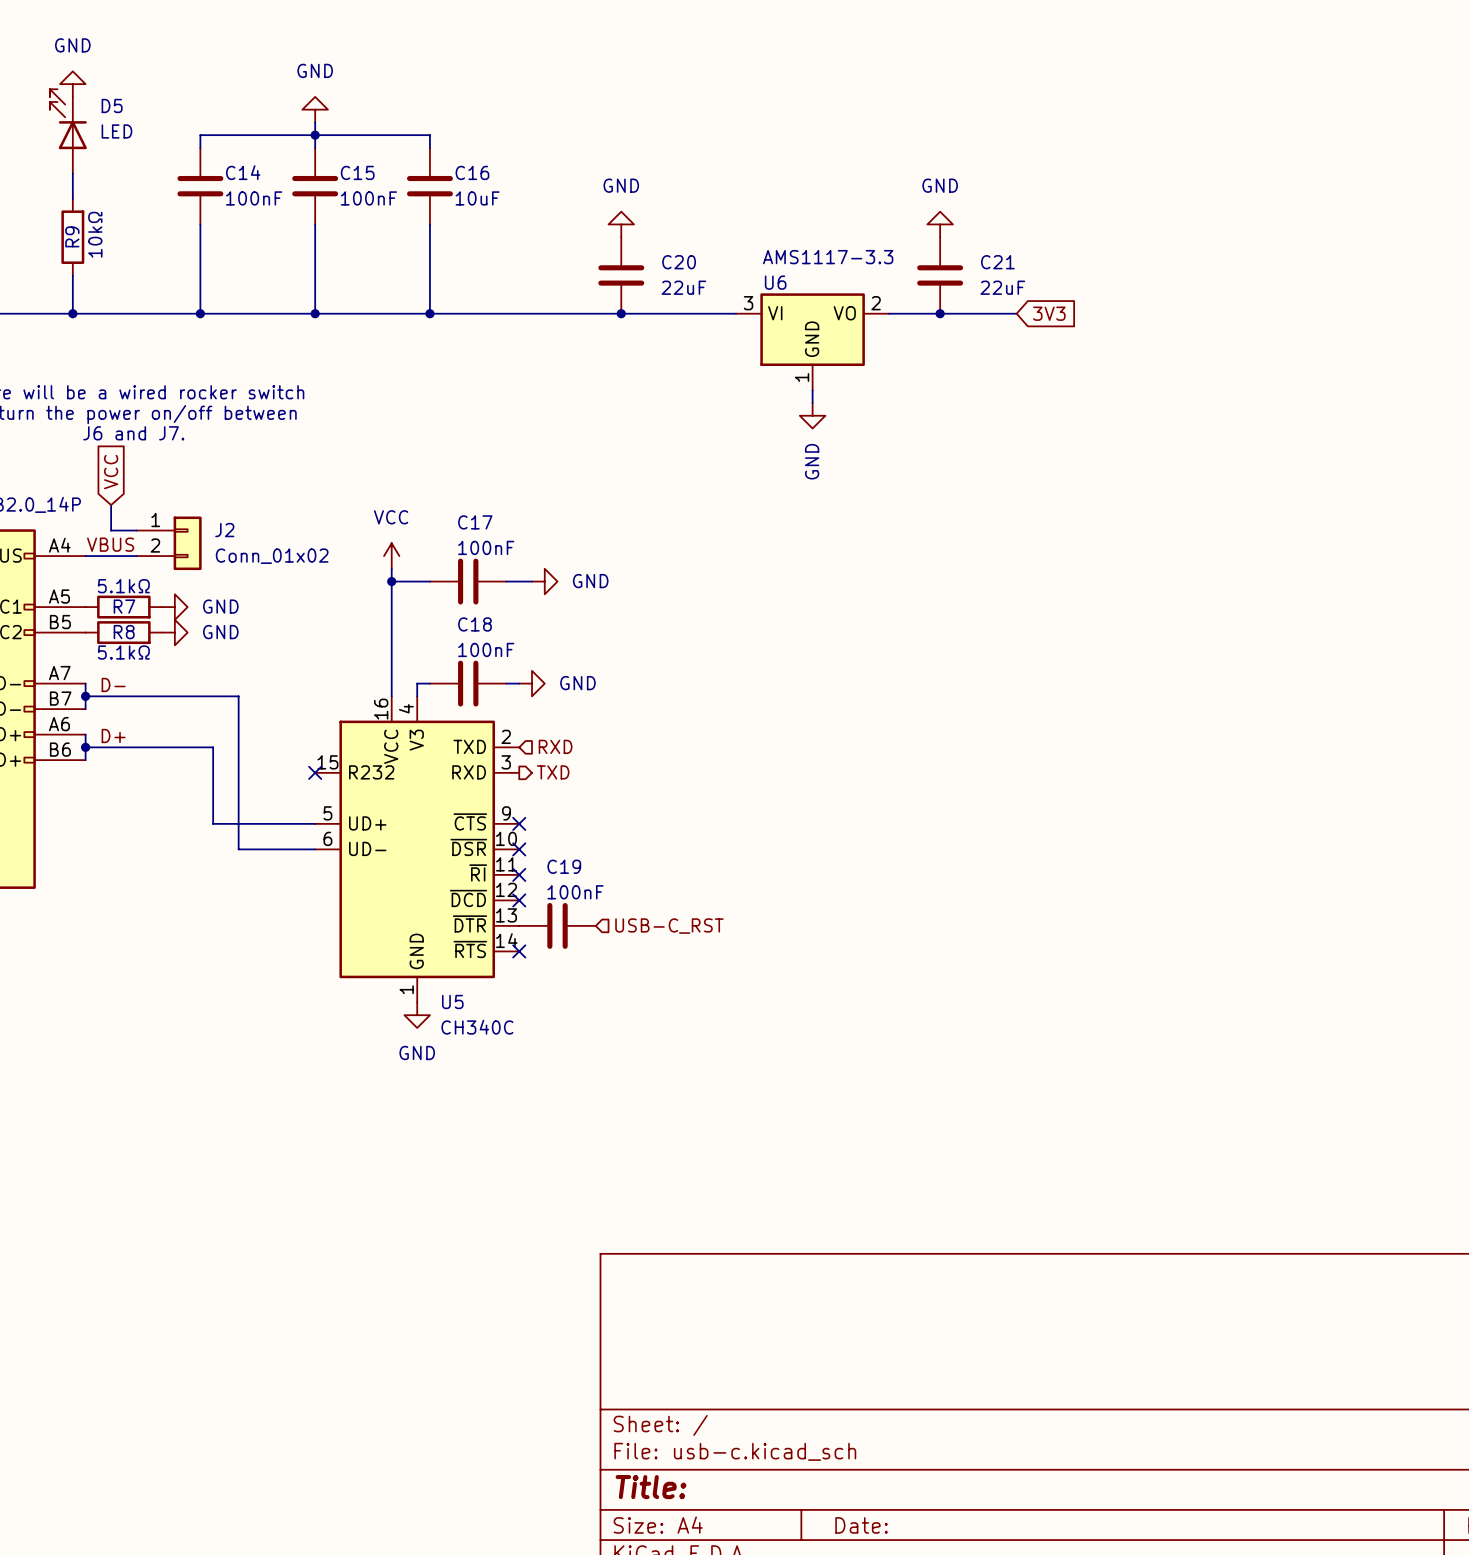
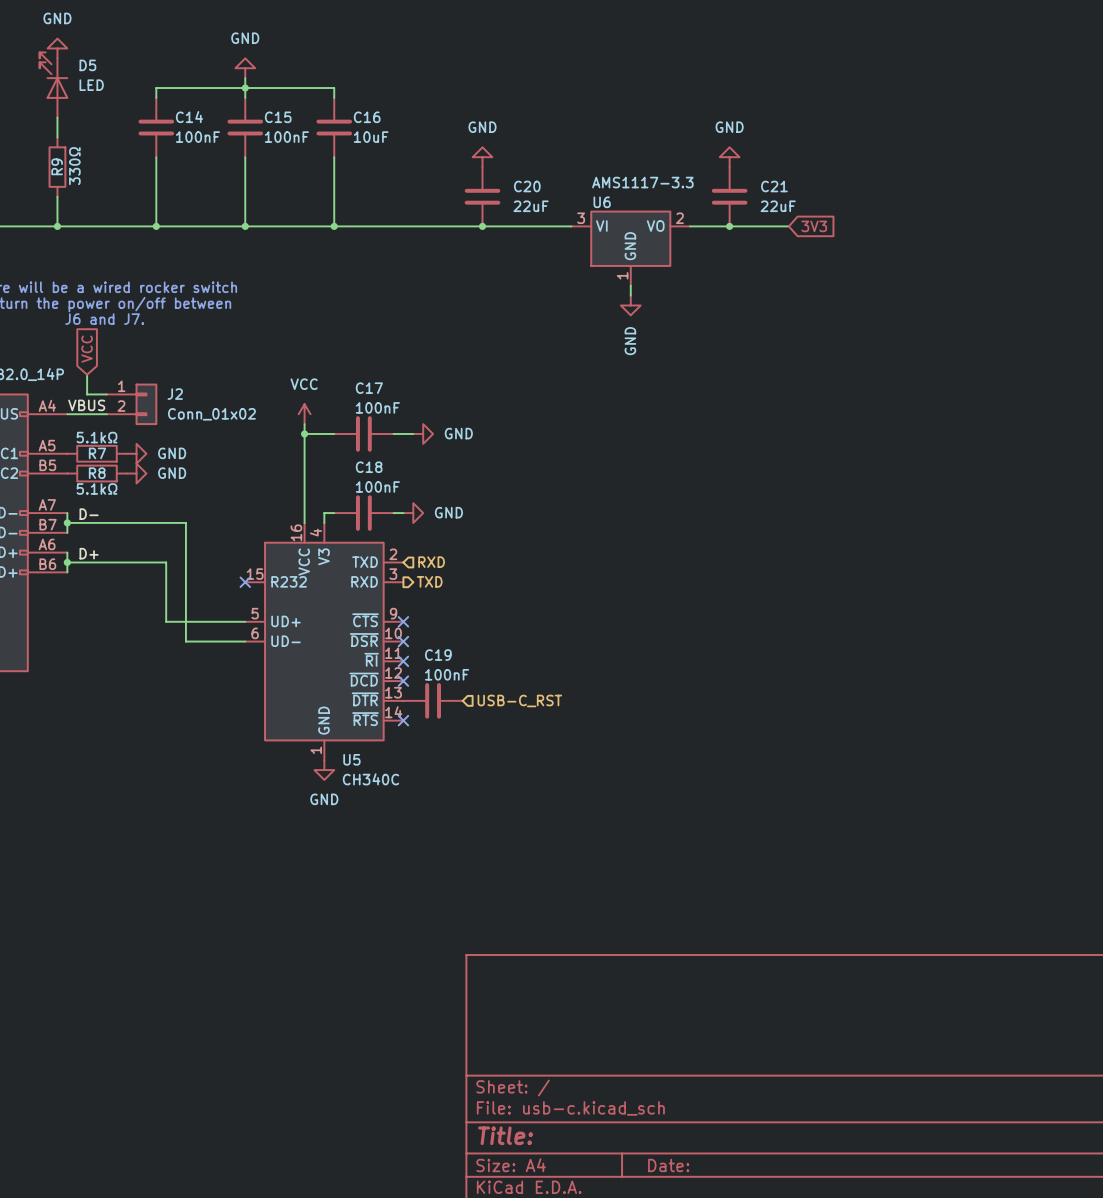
R9 value: 10kΩ (95, 234) -> 330Ω (74, 166)

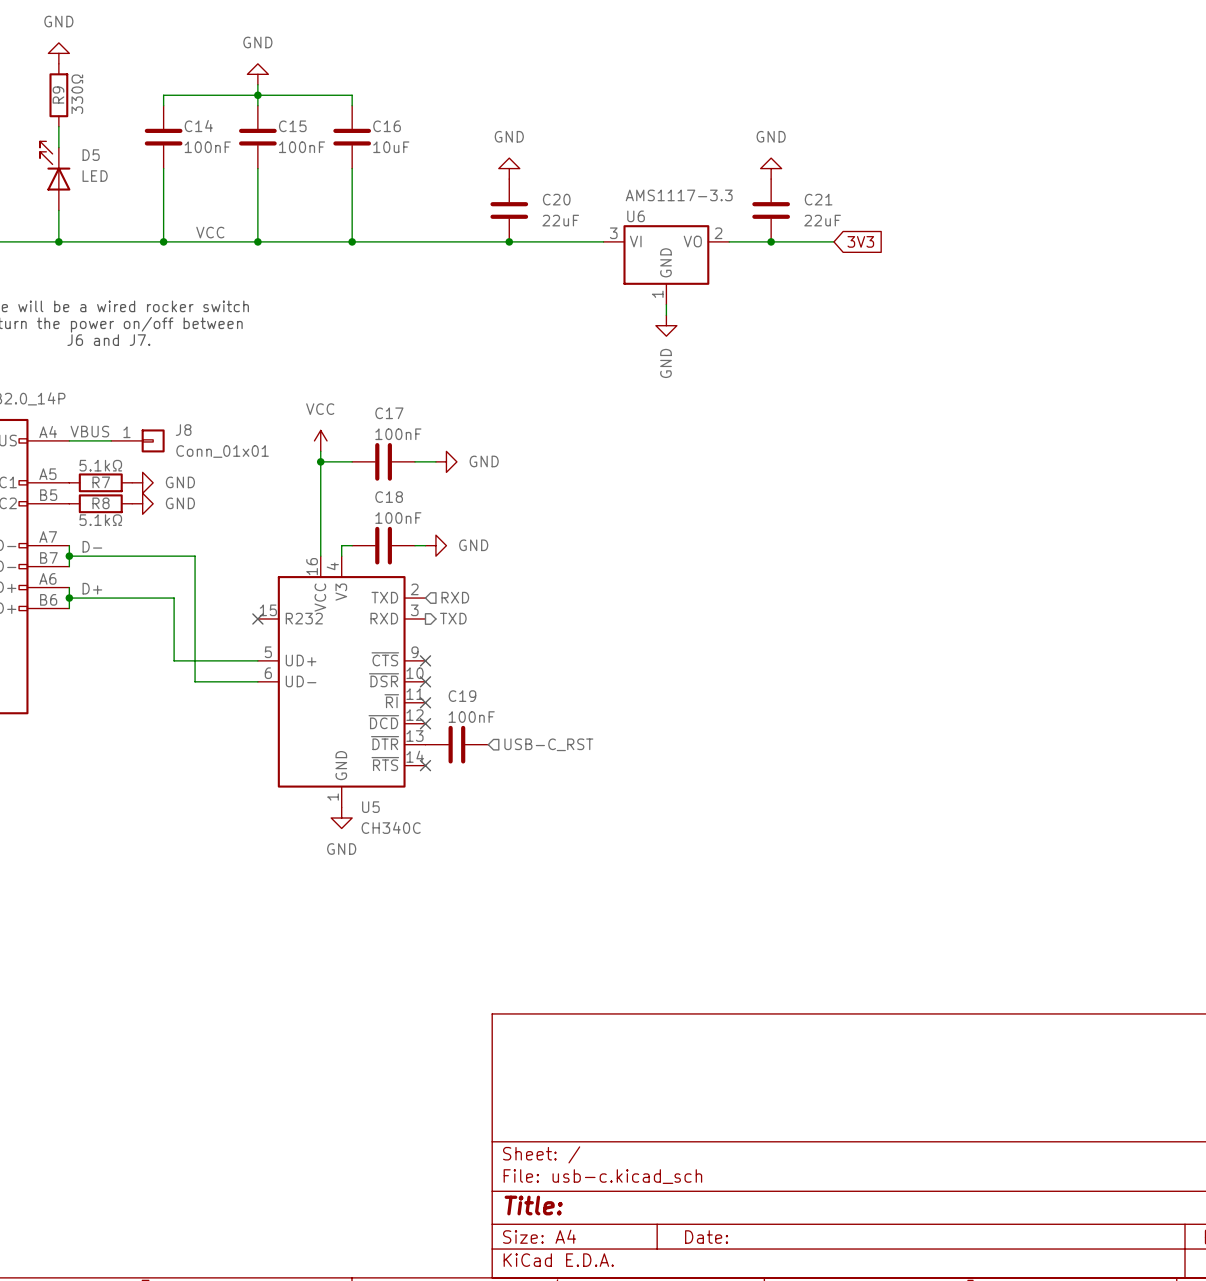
D5 position: (54, 85) -> (55, 175)
R9 position: (57, 167) -> (58, 95)
label: none -> VCC (210, 232)
global label: VCC (87, 349) -> none
wire: (87, 374) (87, 394) (106, 394) -> none
J2: Conn_01x02 (132, 404) -> none
J8: none -> Conn_01x01 (137, 440)

